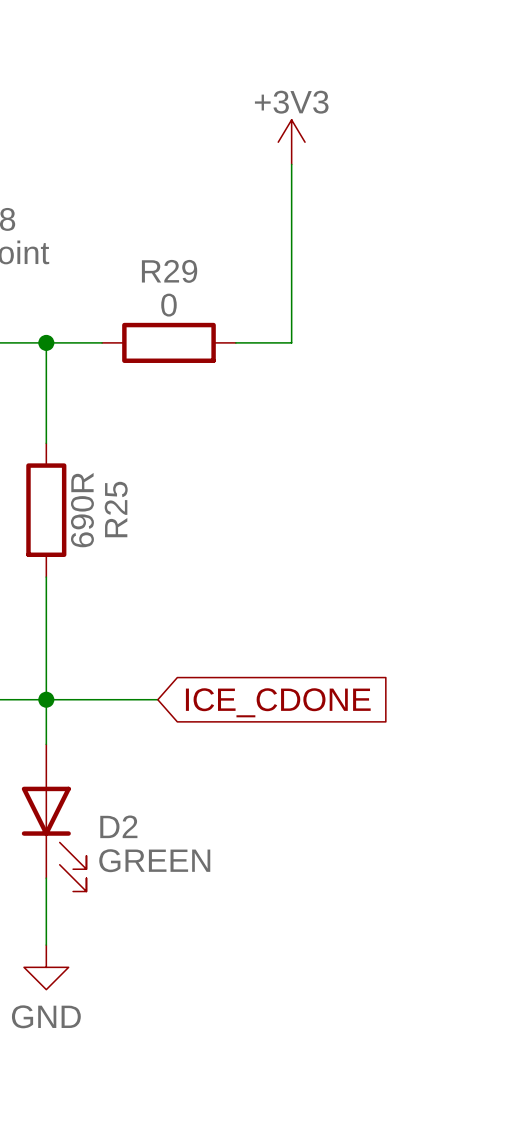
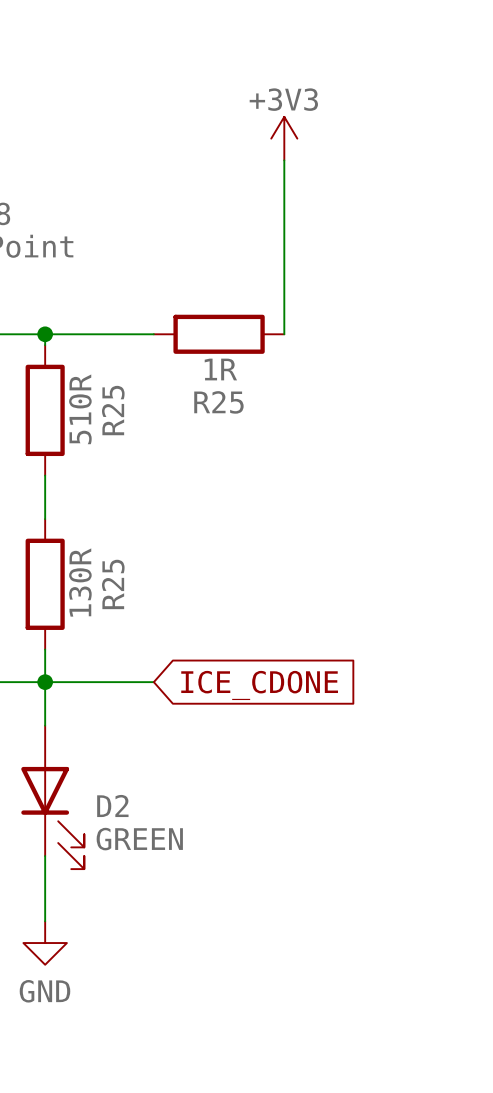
R29: 0 (168, 342) -> none
R25: none -> 1R (219, 334)
wire: (235, 342) (291, 342) -> (99, 334) (153, 334)
wire: (46, 354) (46, 443) -> none
R25: none -> 510R (45, 410)
wire: none -> (45, 475) (45, 519)
R25: 690R (46, 510) -> none
wire: (46, 577) (46, 666) -> none
R25: none -> 130R (45, 584)

